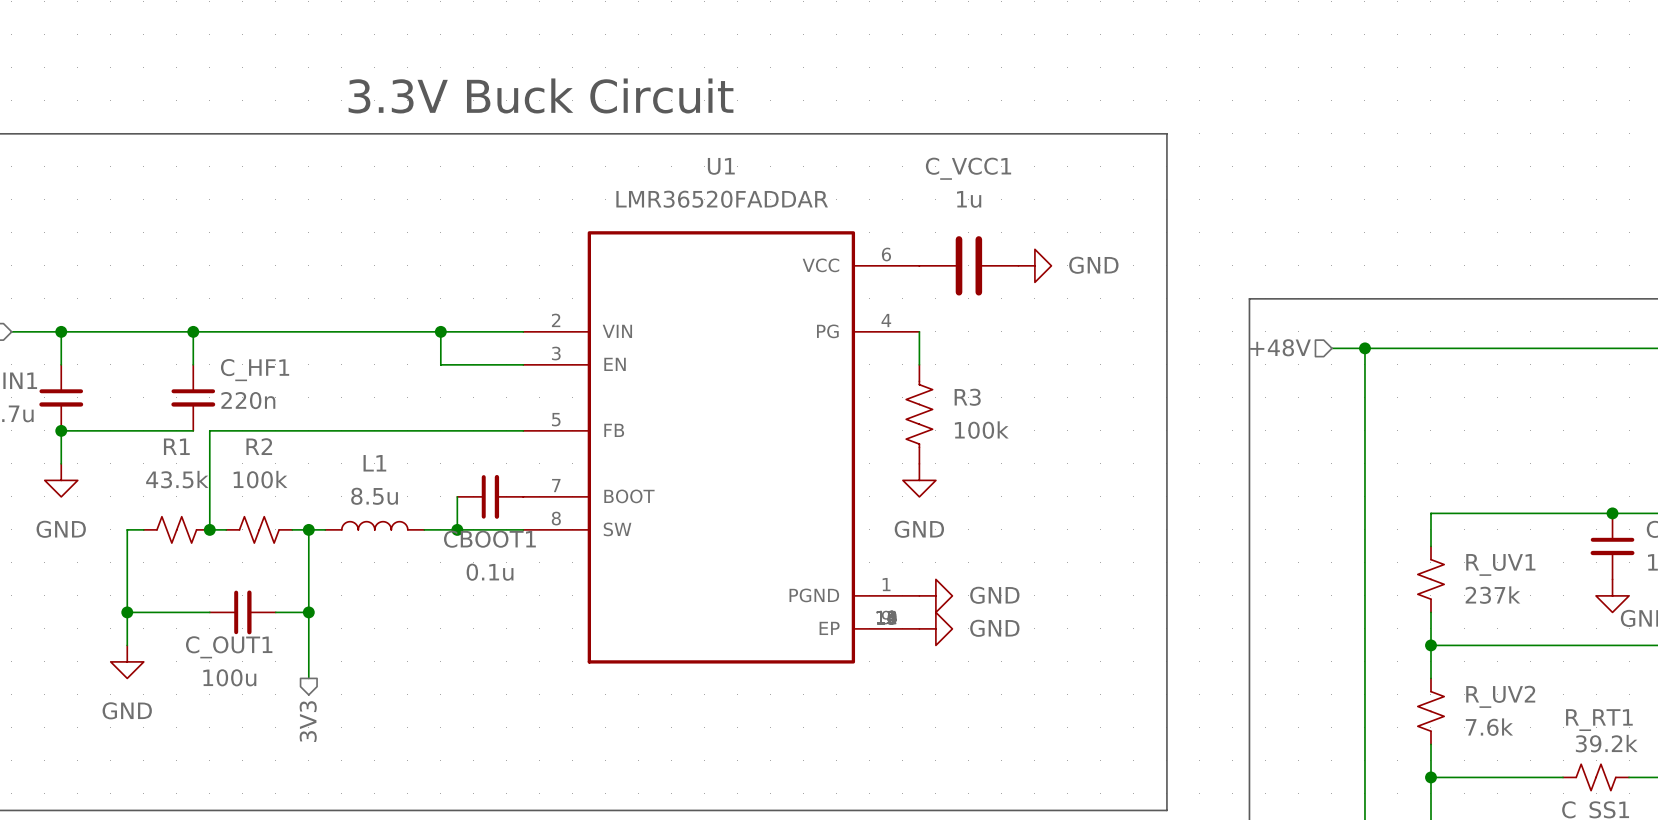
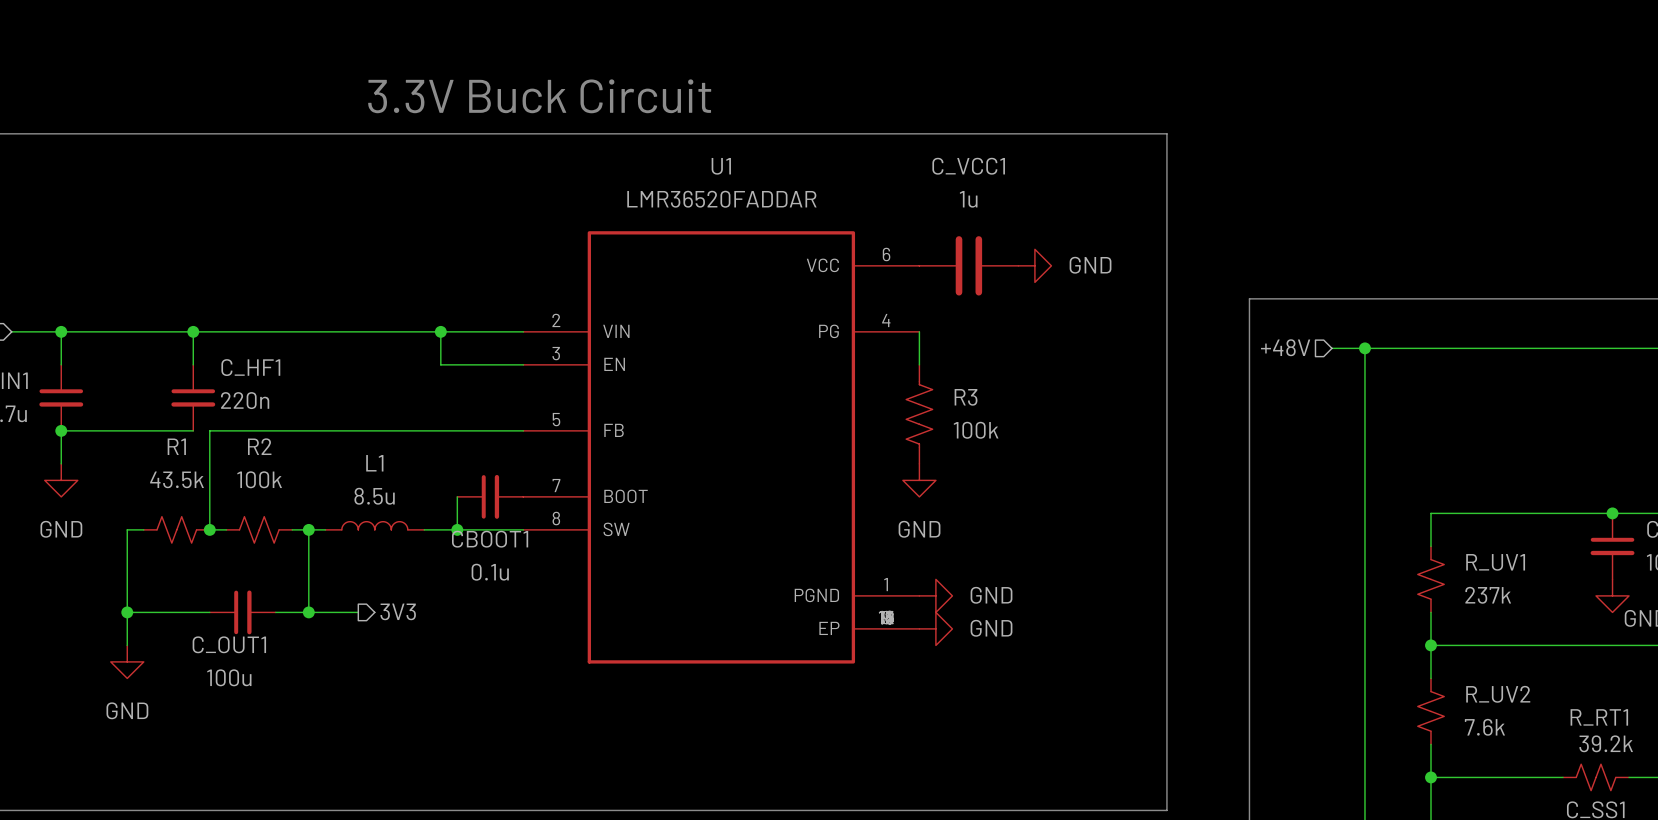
wire: (308, 612) (308, 678) -> (308, 612) (358, 612)
hierarchical label rotation: 0° (308, 721) -> 90° counterclockwise (398, 611)
hierarchical label position: 3V3 (308, 721) -> 3V3 (398, 611)

